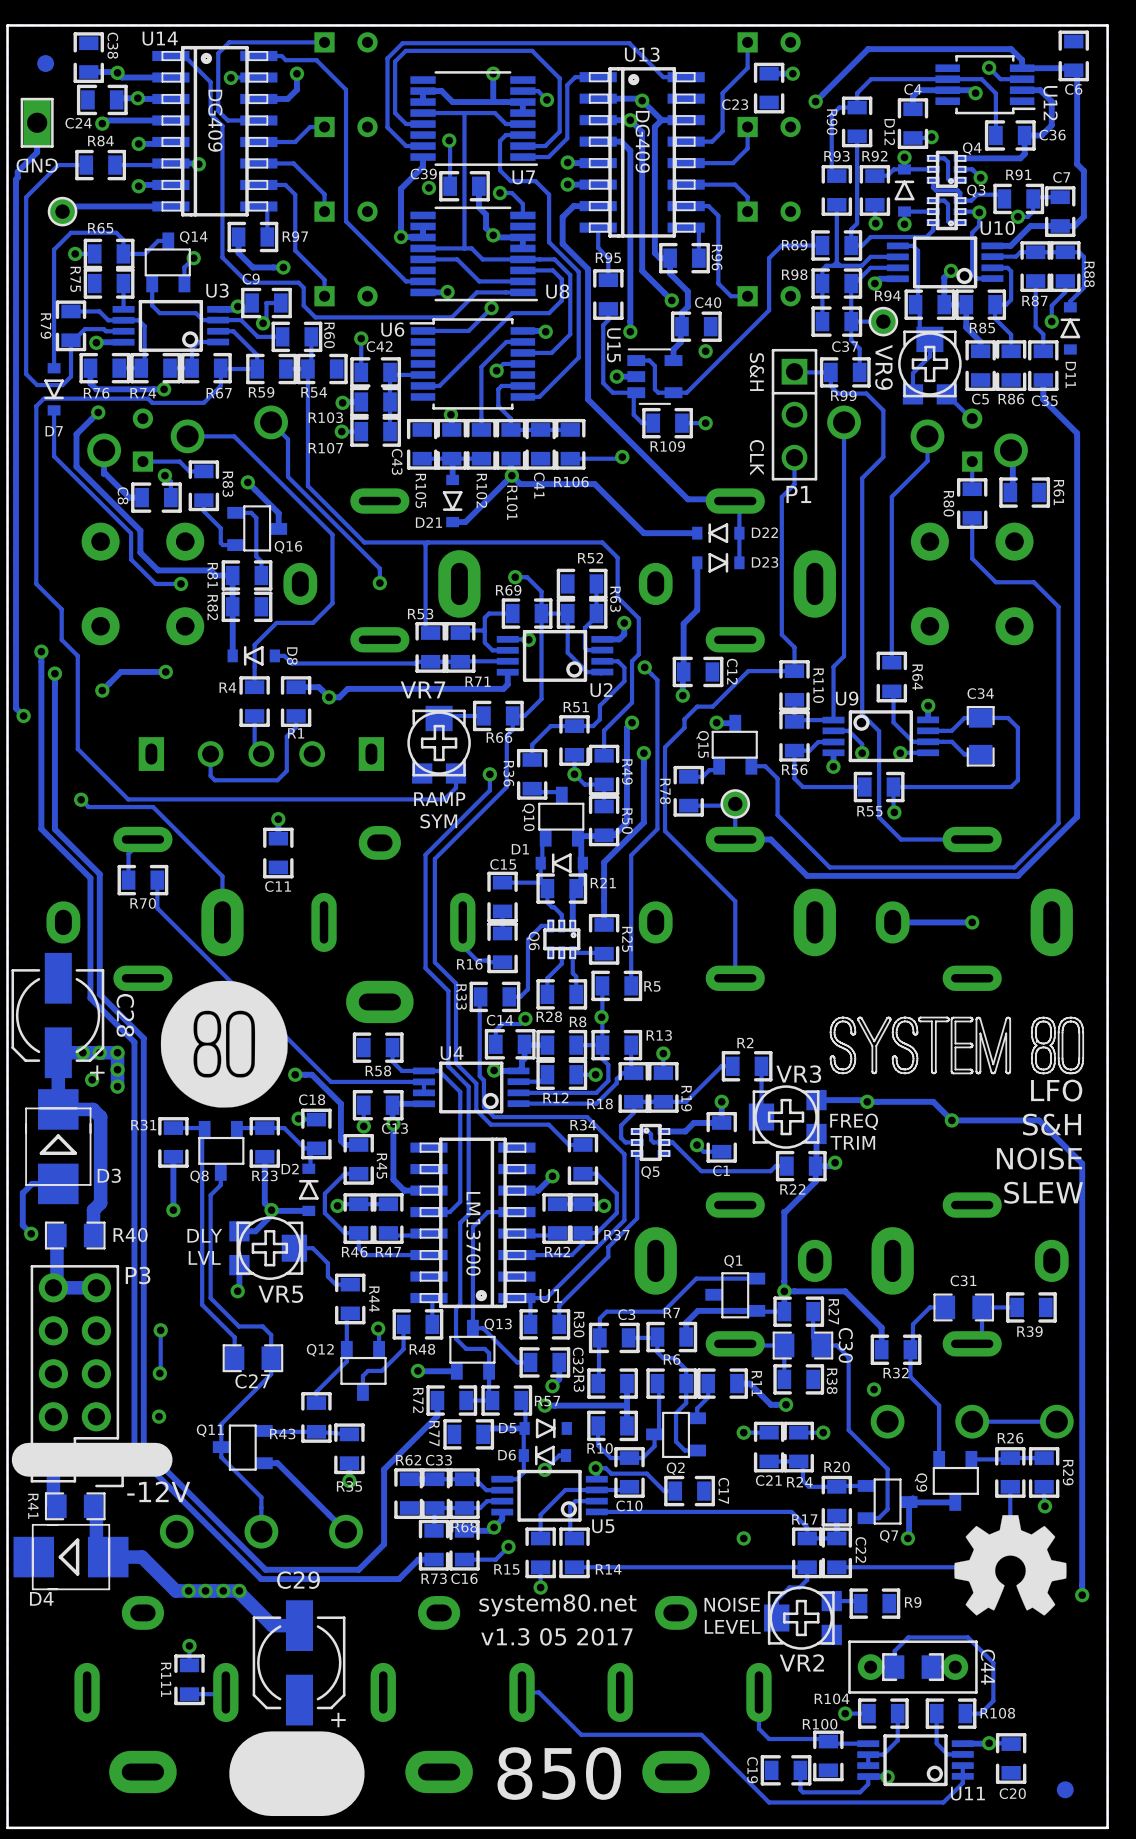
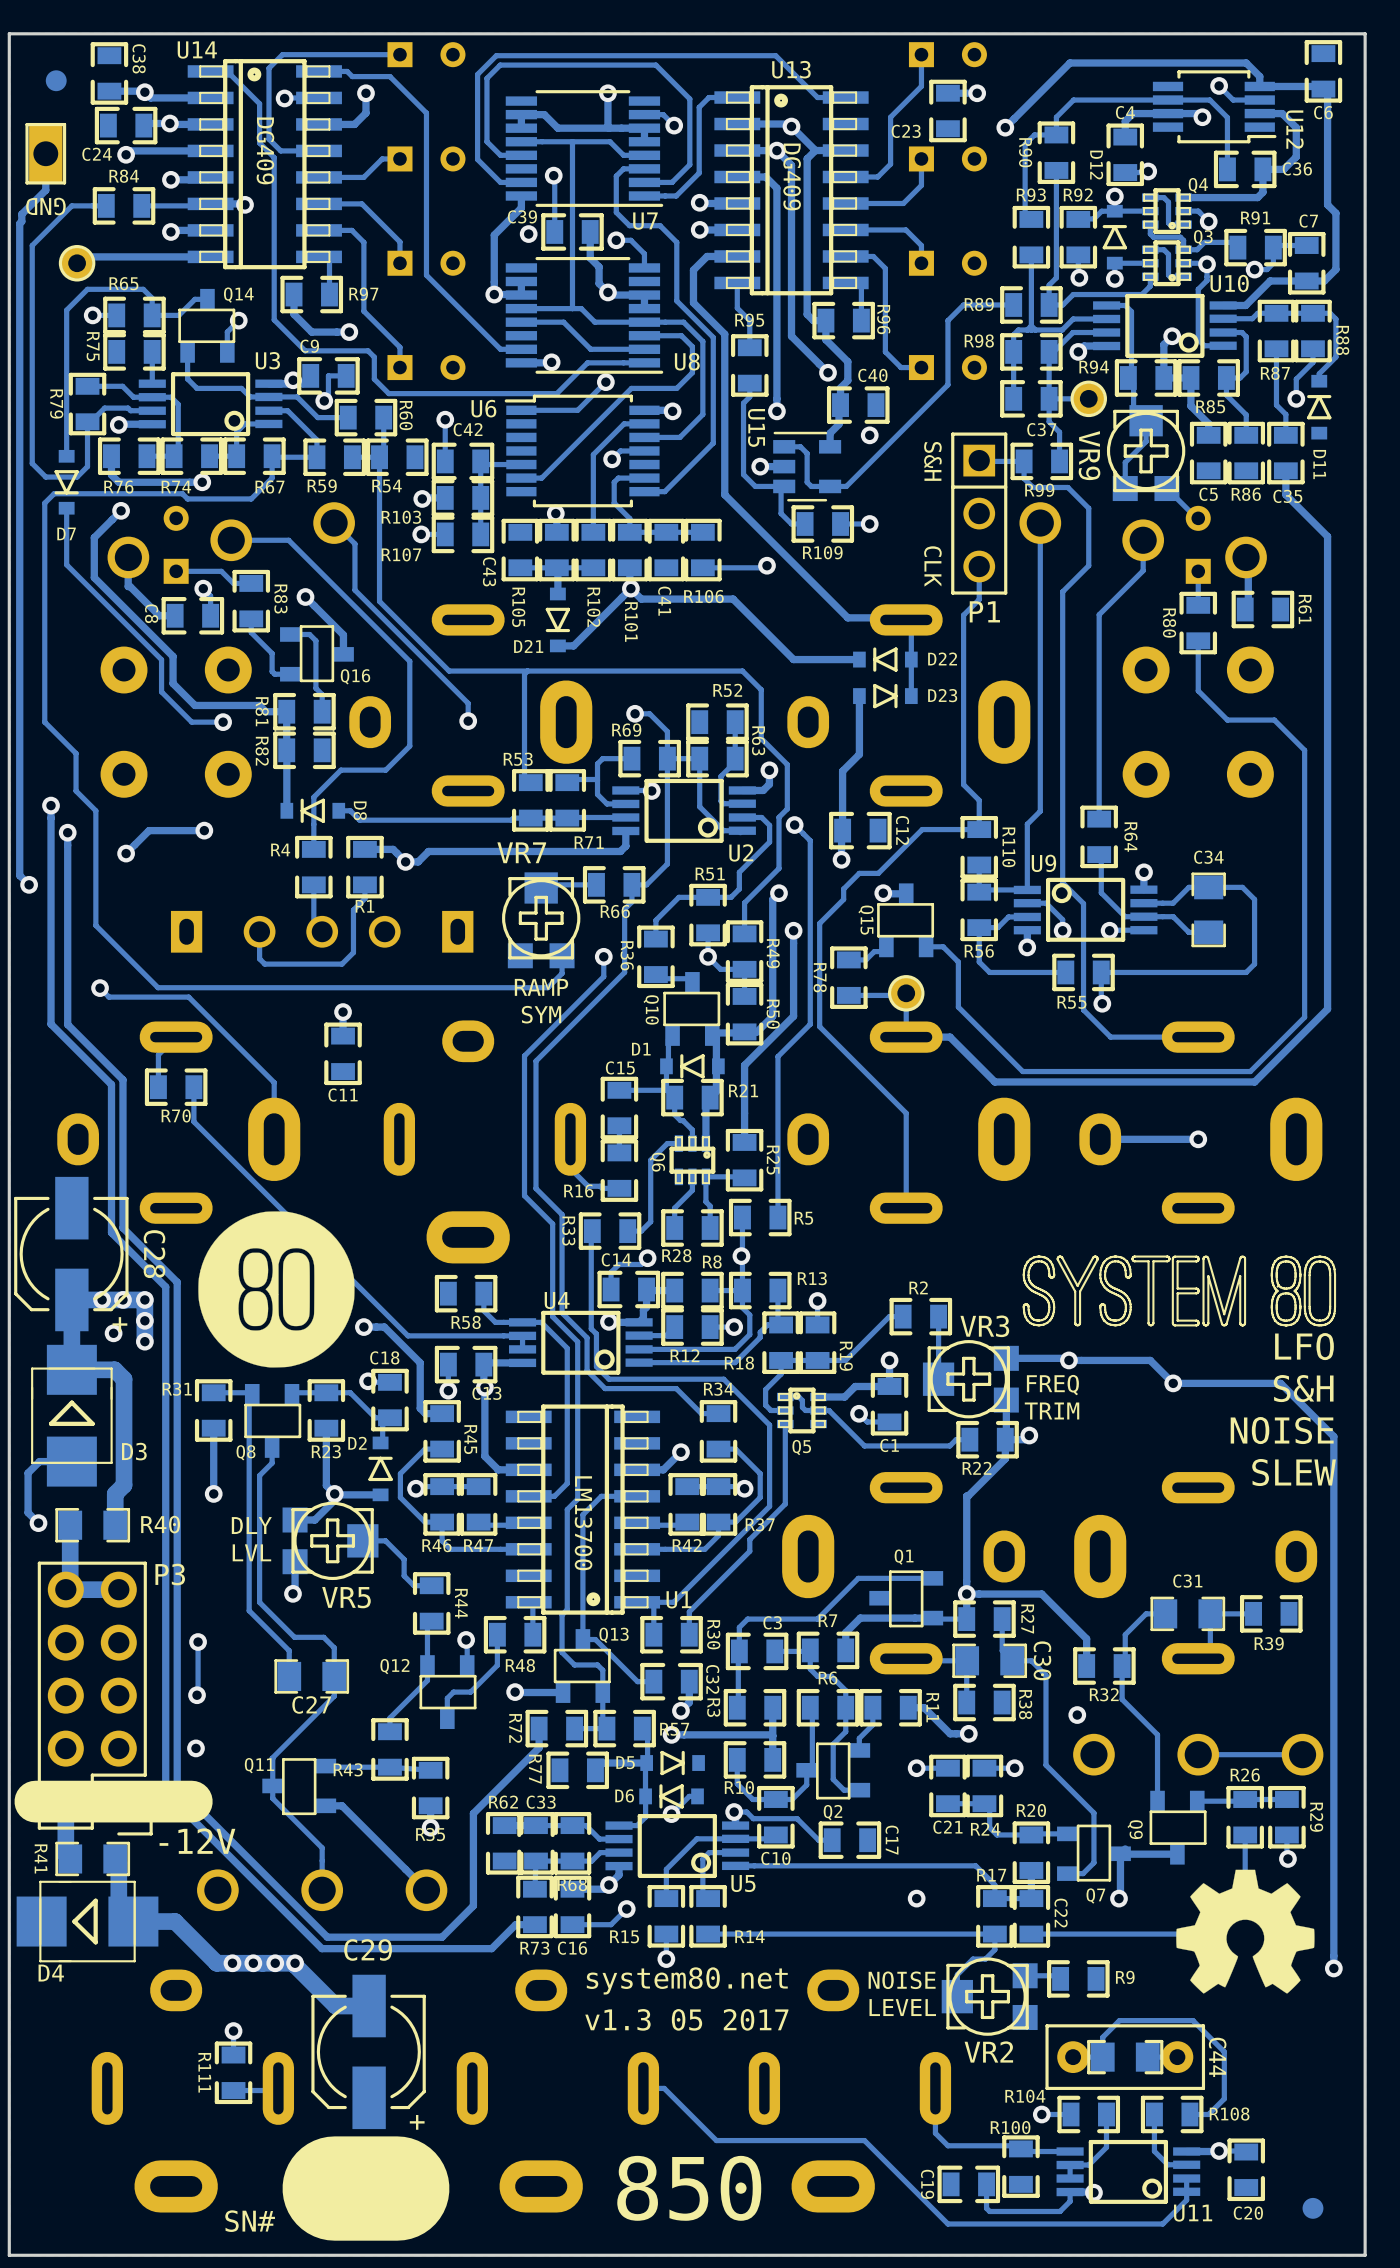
text: none -> SN# (250, 2221)

